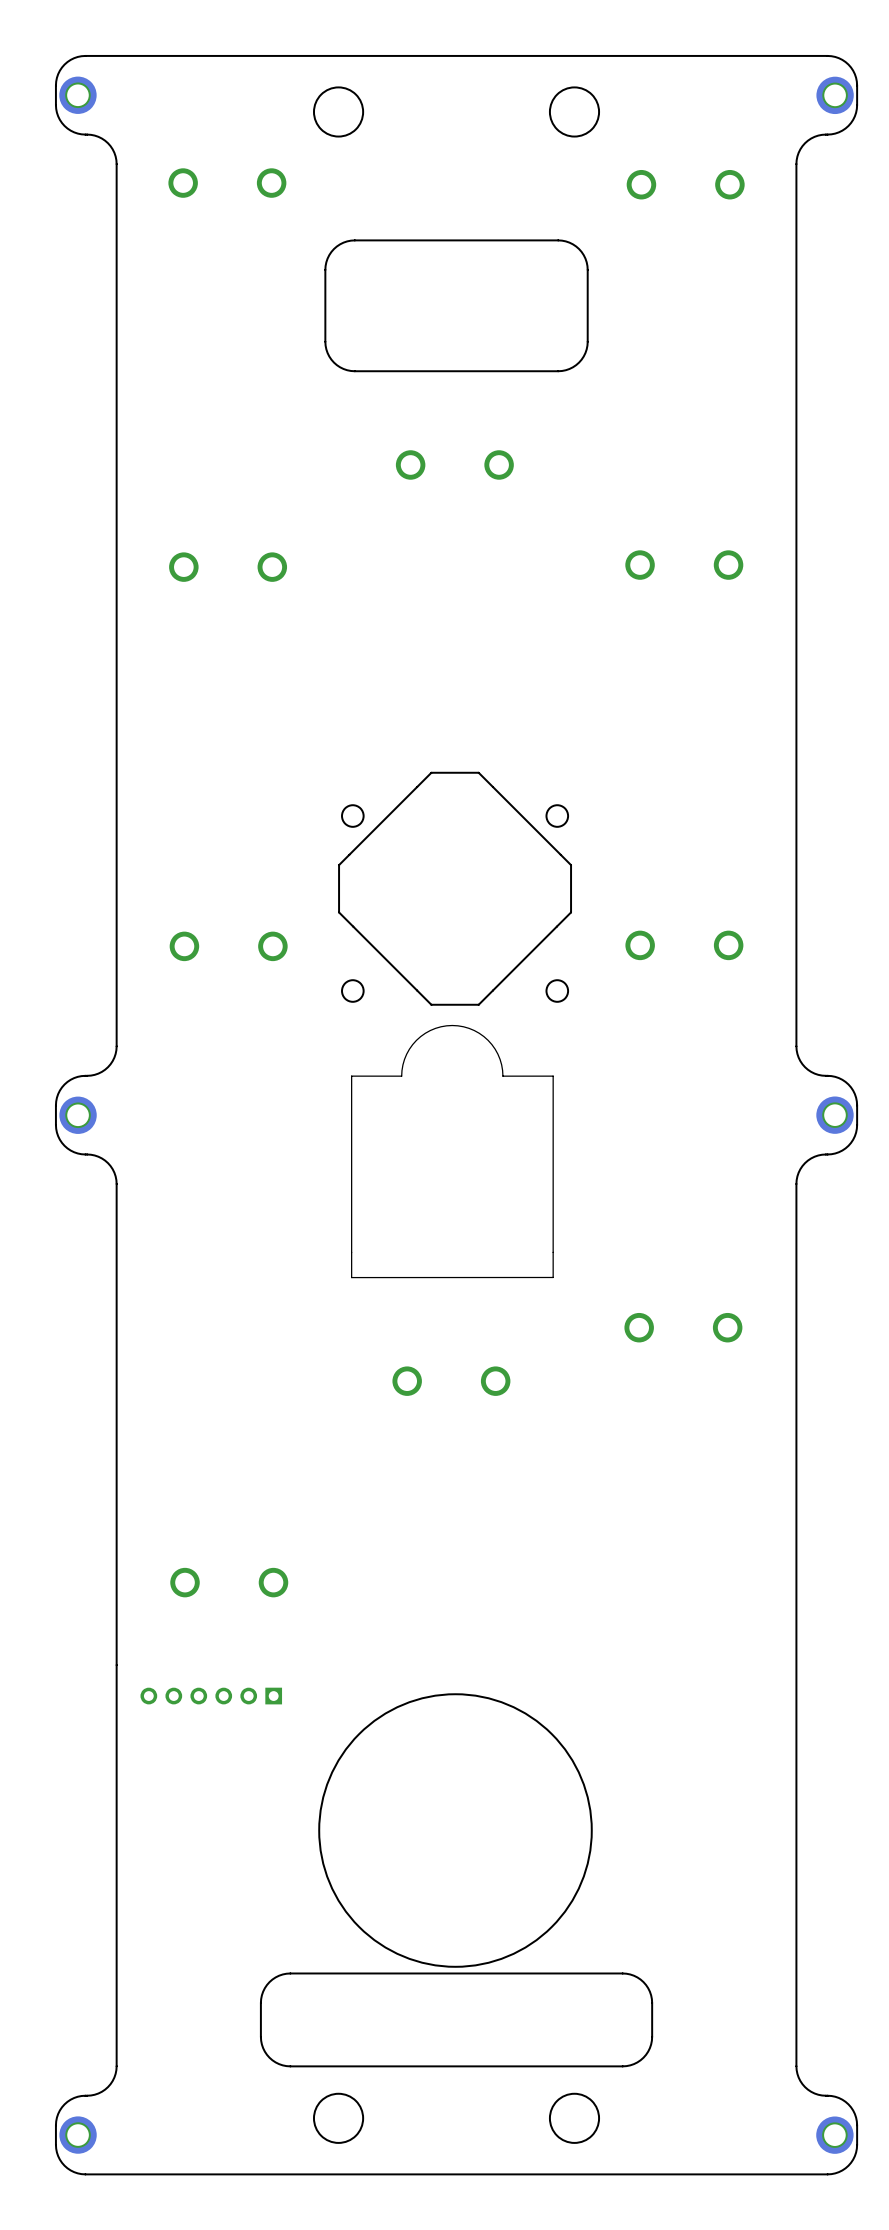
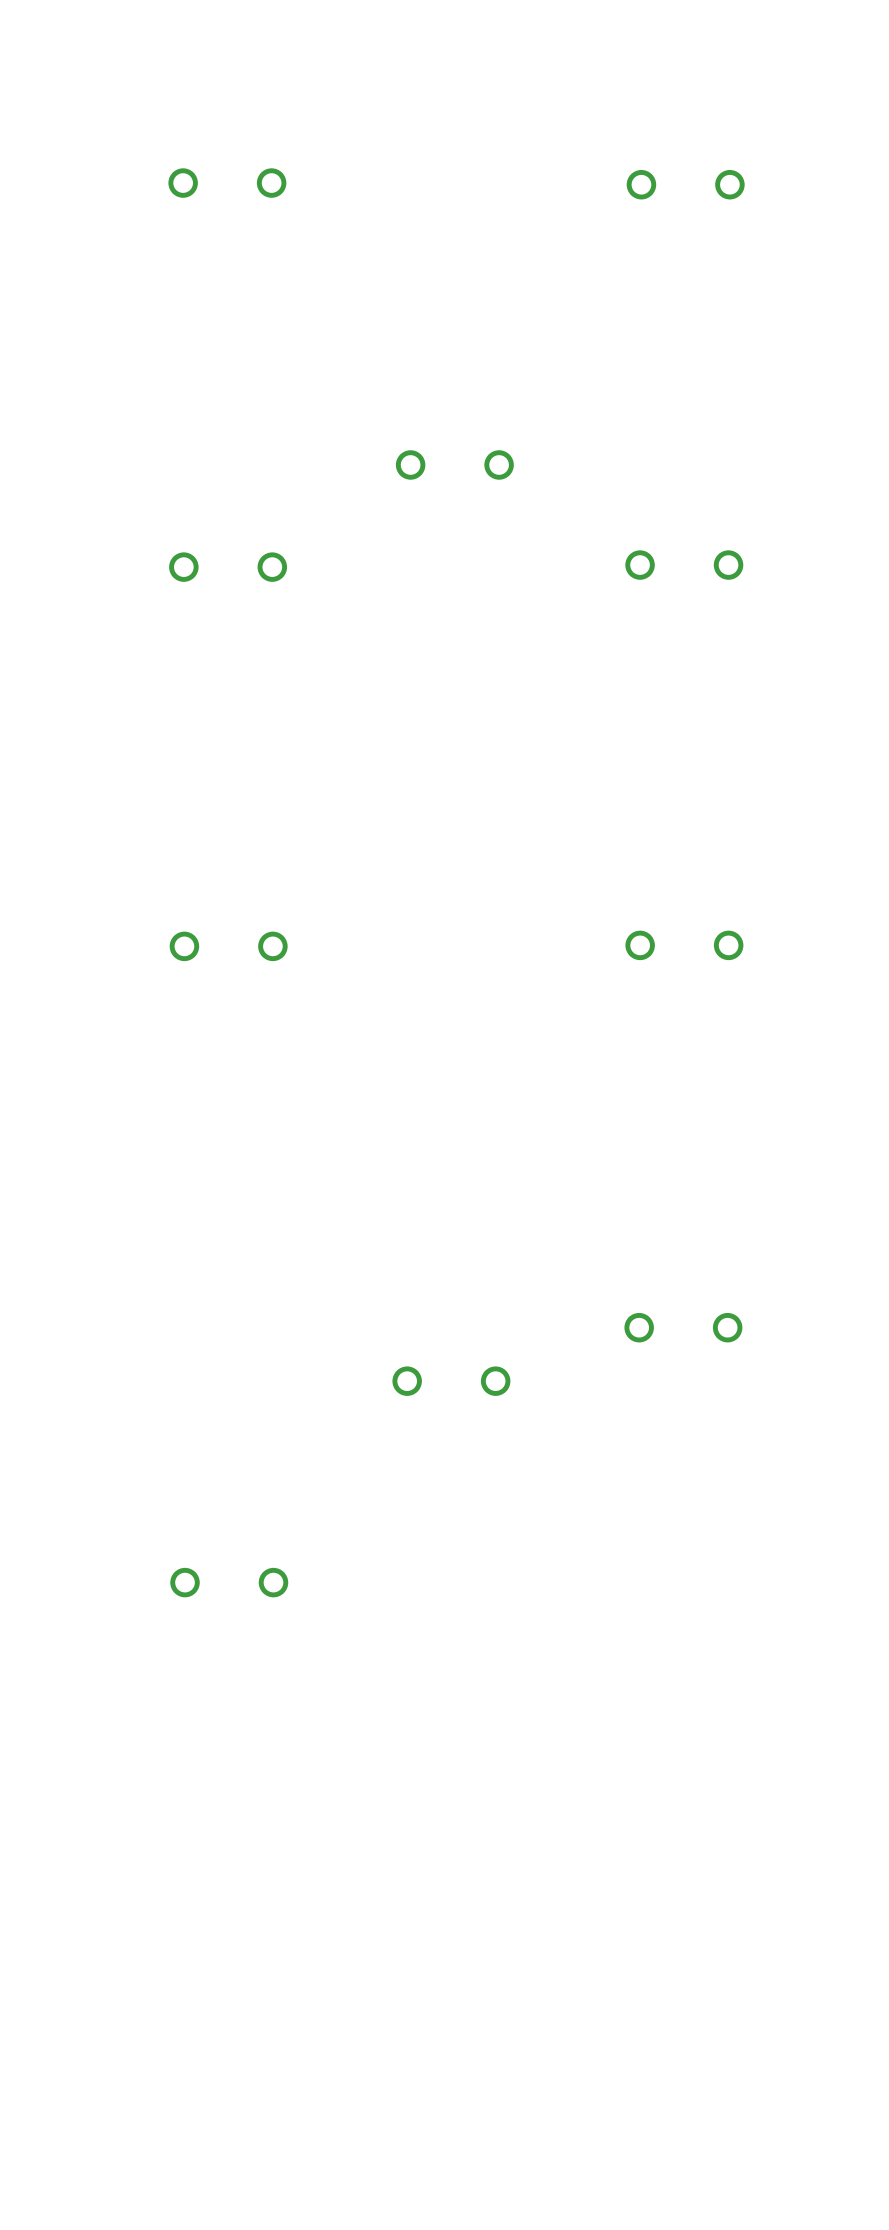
board edge: (827, 55) (85, 55) (70, 59) (62, 67) (58, 74) (55, 105) (59, 119) (64, 125) (74, 132) (94, 135) (105, 140) (112, 149) (116, 164) (116, 1046) (114, 1057) (108, 1067) (98, 1073) (77, 1076) (67, 1081) (58, 1094) (55, 1105) (56, 1128) (62, 1142) (74, 1152) (94, 1155) (105, 1160) (112, 1169) (116, 1183) (116, 2066) (114, 2077) (105, 2089) (94, 2094) (70, 2099) (62, 2107) (58, 2113) (55, 2125) (56, 2152) (62, 2162) (74, 2172) (85, 2174) (827, 2174) (835, 2173) (845, 2168) (854, 2156) (857, 2125) (853, 2110) (845, 2101) (838, 2097) (818, 2094) (807, 2089) (798, 2077) (796, 2066) (796, 1183) (800, 1169) (807, 1160) (818, 1155) (838, 1152) (848, 1145) (854, 1136) (857, 1124) (856, 1101) (851, 1087) (838, 1078) (818, 1074) (807, 1069) (800, 1061) (796, 1046) (796, 164) (798, 152) (805, 143) (814, 136) (835, 133) (845, 128) (853, 119) (857, 105) (856, 81) (853, 70) (842, 59) (827, 55) -> none
round board edge: [313, 86, 365, 138] -> none
round board edge: [548, 86, 601, 138] -> none
part: (77, 95) -> none
part: (835, 95) -> none
board edge: (558, 240) (354, 240) (340, 244) (331, 251) (325, 266) (325, 341) (329, 356) (340, 367) (354, 371) (558, 371) (572, 367) (581, 359) (587, 345) (587, 266) (583, 255) (579, 249) (569, 242) (558, 240) -> none
board edge: (478, 772) (571, 865) (571, 912) (478, 1004) (431, 1004) (339, 912) (339, 865) (431, 772) (478, 772) -> none
round board edge: [341, 804, 365, 828] -> none
round board edge: [545, 804, 570, 828] -> none
round board edge: [341, 979, 365, 1003] -> none
round board edge: [545, 979, 570, 1003] -> none
board edge: (553, 1076) (553, 1277) (351, 1277) (351, 1076) (401, 1076) (404, 1059) (416, 1040) (430, 1030) (452, 1025) (474, 1030) (488, 1040) (500, 1059) (502, 1076) (553, 1076) -> none
part: (78, 1115) -> none
part: (835, 1115) -> none
round board edge: [318, 1693, 593, 1968] -> none
part: (211, 1696) -> none
board edge: (622, 1973) (286, 1973) (272, 1979) (263, 1991) (260, 2002) (261, 2040) (264, 2051) (269, 2057) (275, 2062) (286, 2066) (626, 2066) (640, 2060) (649, 2048) (652, 2036) (652, 2002) (649, 1991) (643, 1982) (633, 1975) (622, 1973) -> none
round board edge: [313, 2092, 365, 2144] -> none
round board edge: [548, 2092, 601, 2144] -> none
part: (78, 2135) -> none
part: (834, 2135) -> none

